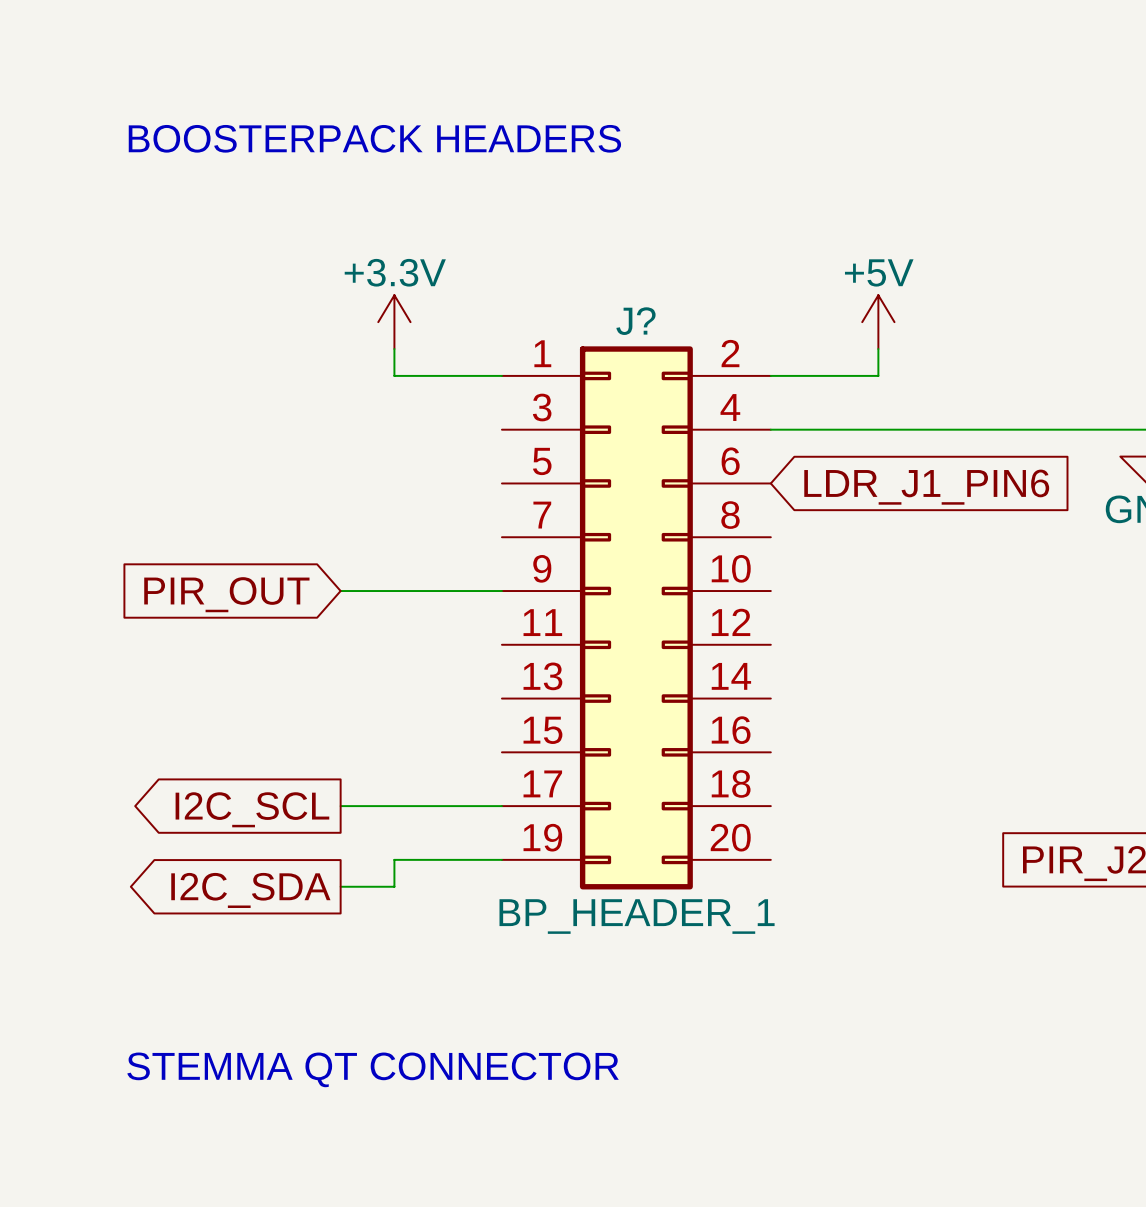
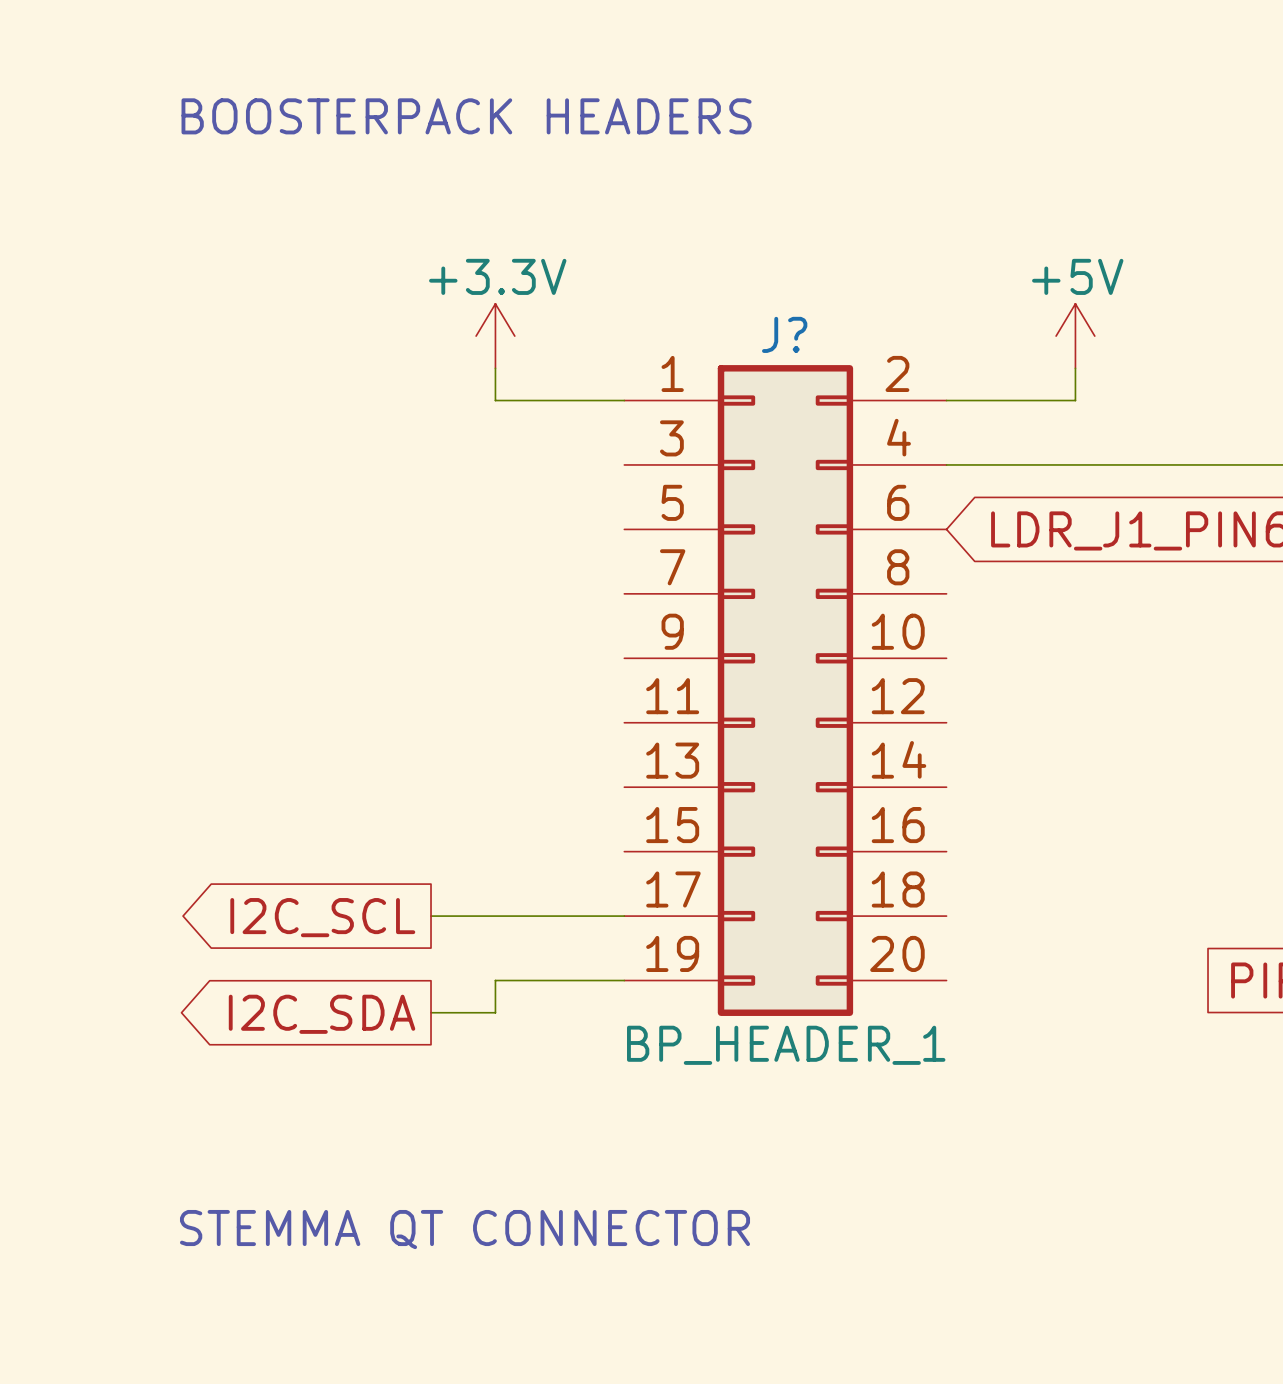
wire: (340, 591) (501, 591) -> none
global label: PIR_OUT (226, 594) -> none

